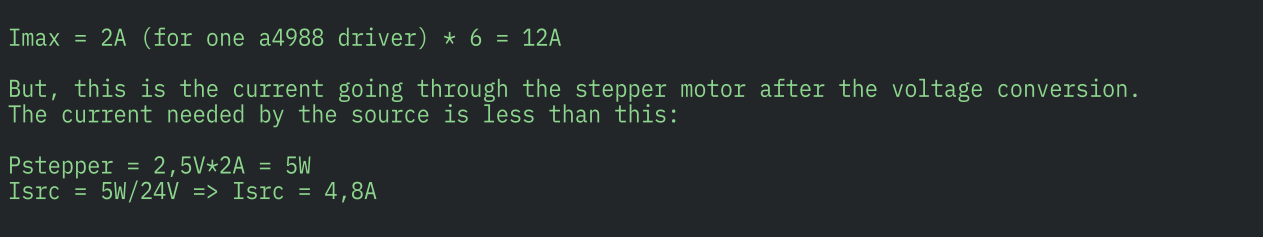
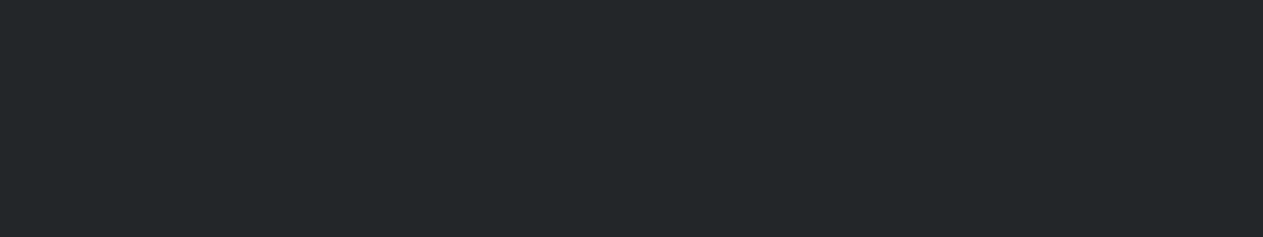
text: Imax = 2A (for one a4988 driver) * 6 = 12A (285, 38) -> none
text: But, this is the current going through the stepper motor after the voltage conversion. (573, 90) -> none
text: The current needed by the source is less than this: (341, 115) -> none
text: Pstepper = 2,5V*2A = 5W (160, 167) -> none
text: Isrc = 5W/24V => Isrc = 4,8A (193, 191) -> none

